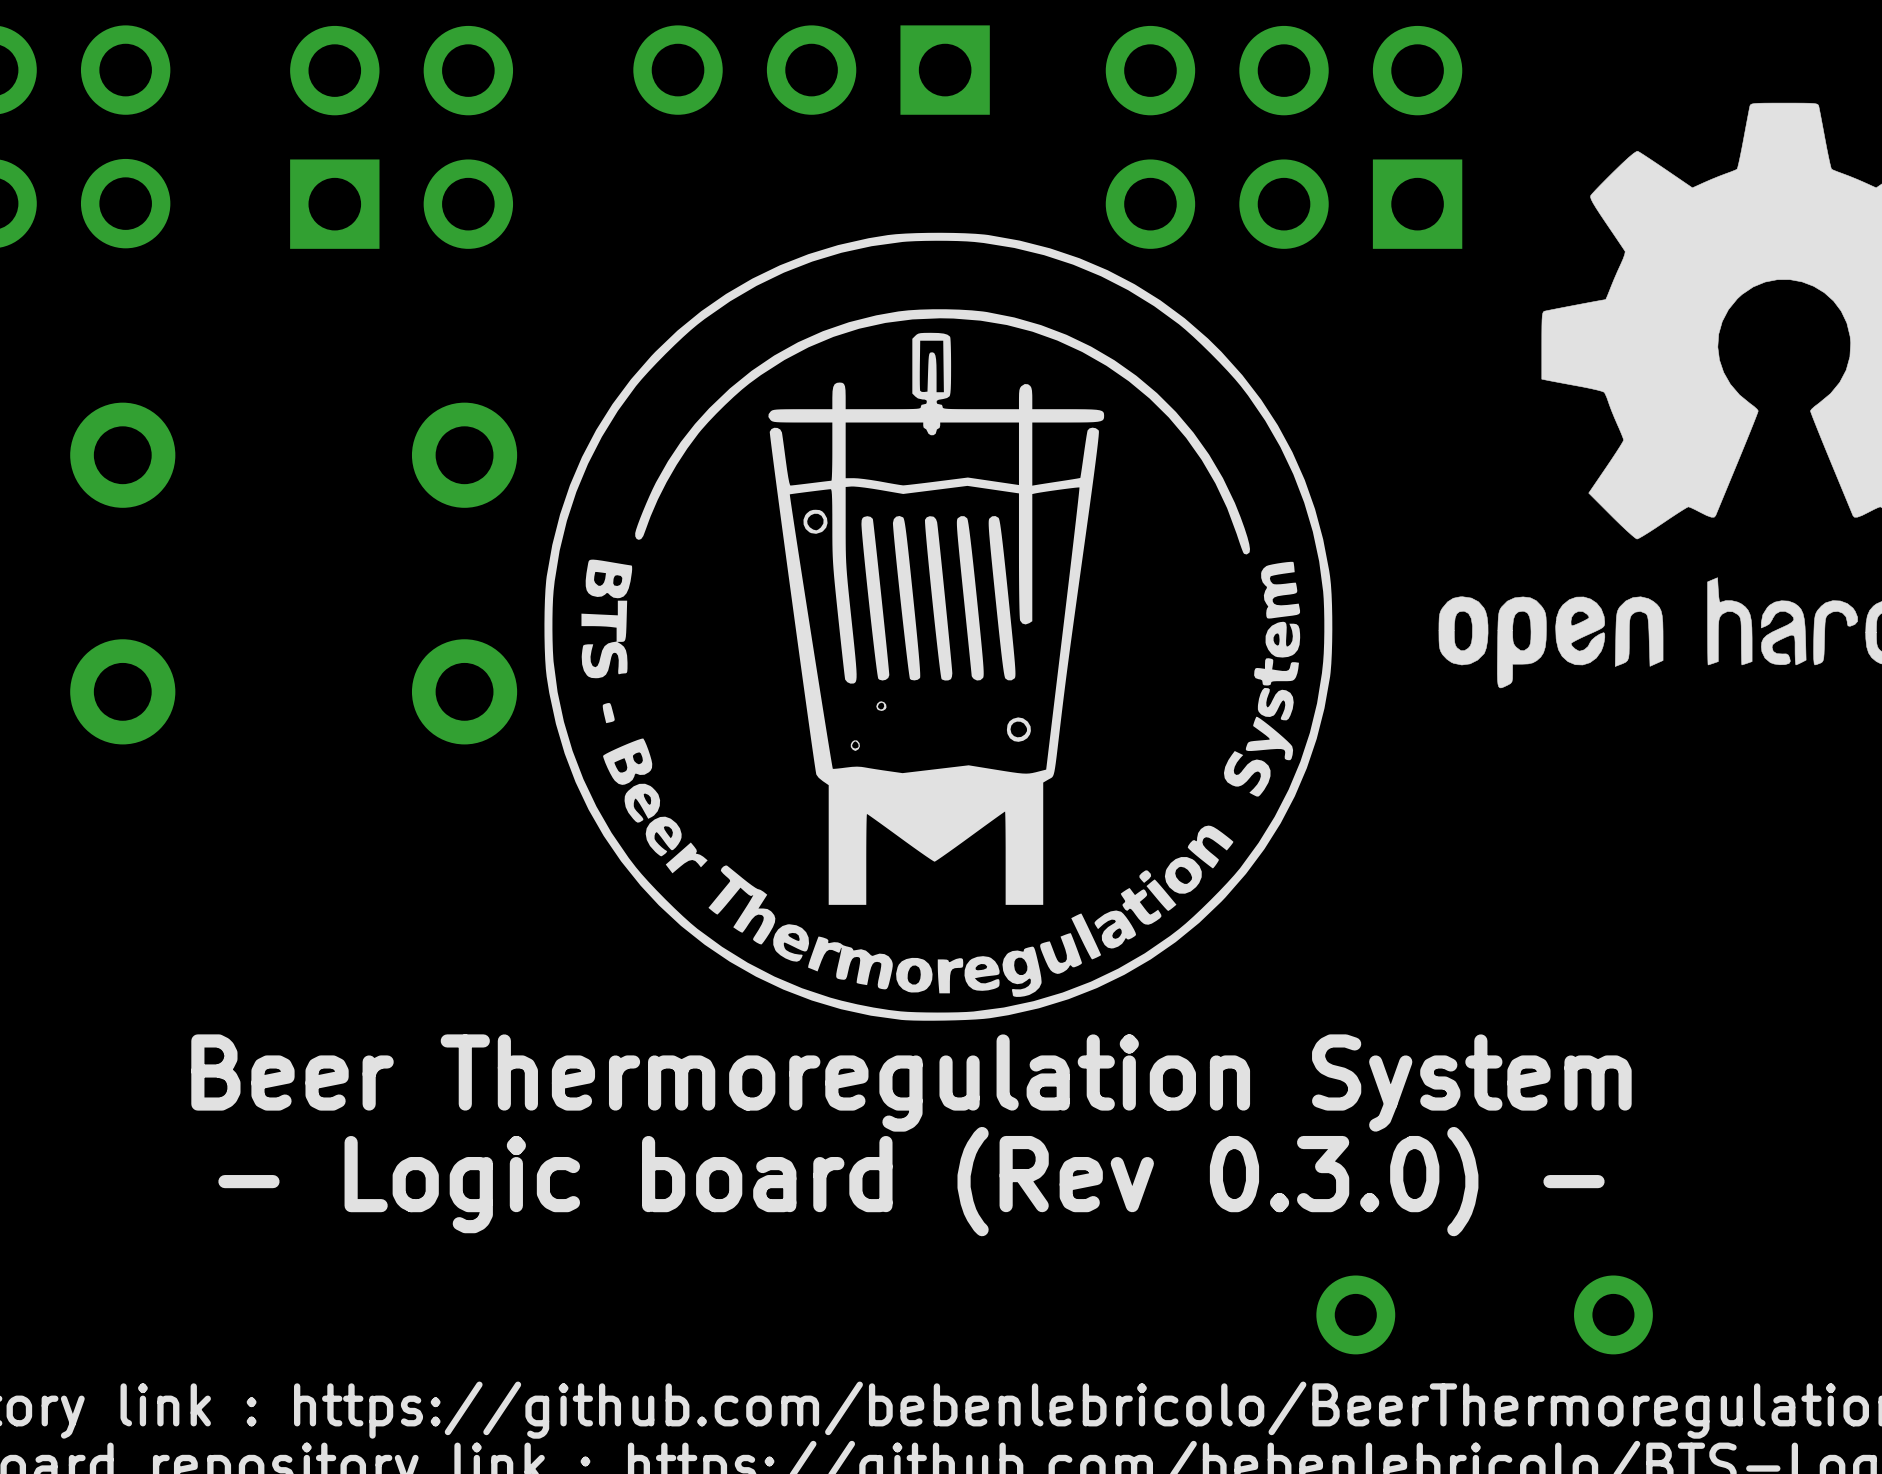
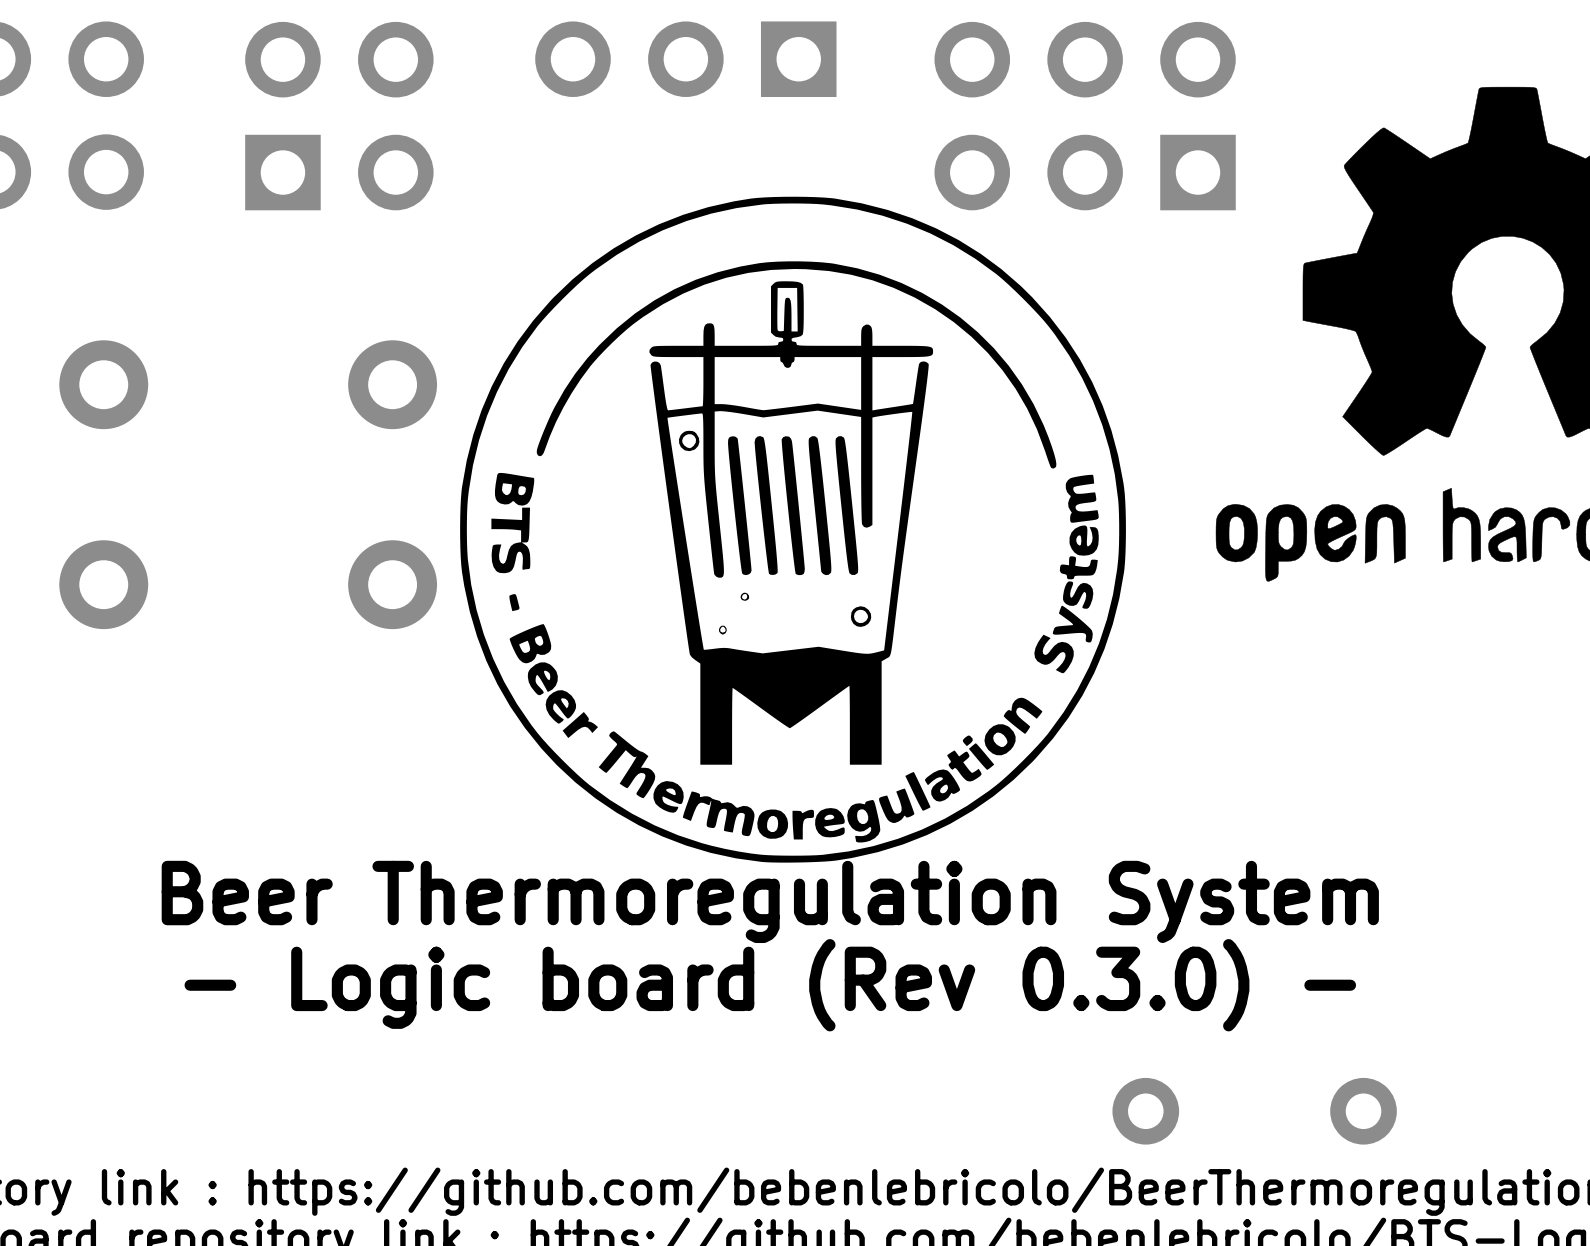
text position: Beer Thermoregulation System (911, 1083) -> Beer Thermoregulation System (770, 901)
text position: - Logic board (Rev 0.3.0) - (911, 1181) -> - Logic board (Rev 0.3.0) - (770, 985)

